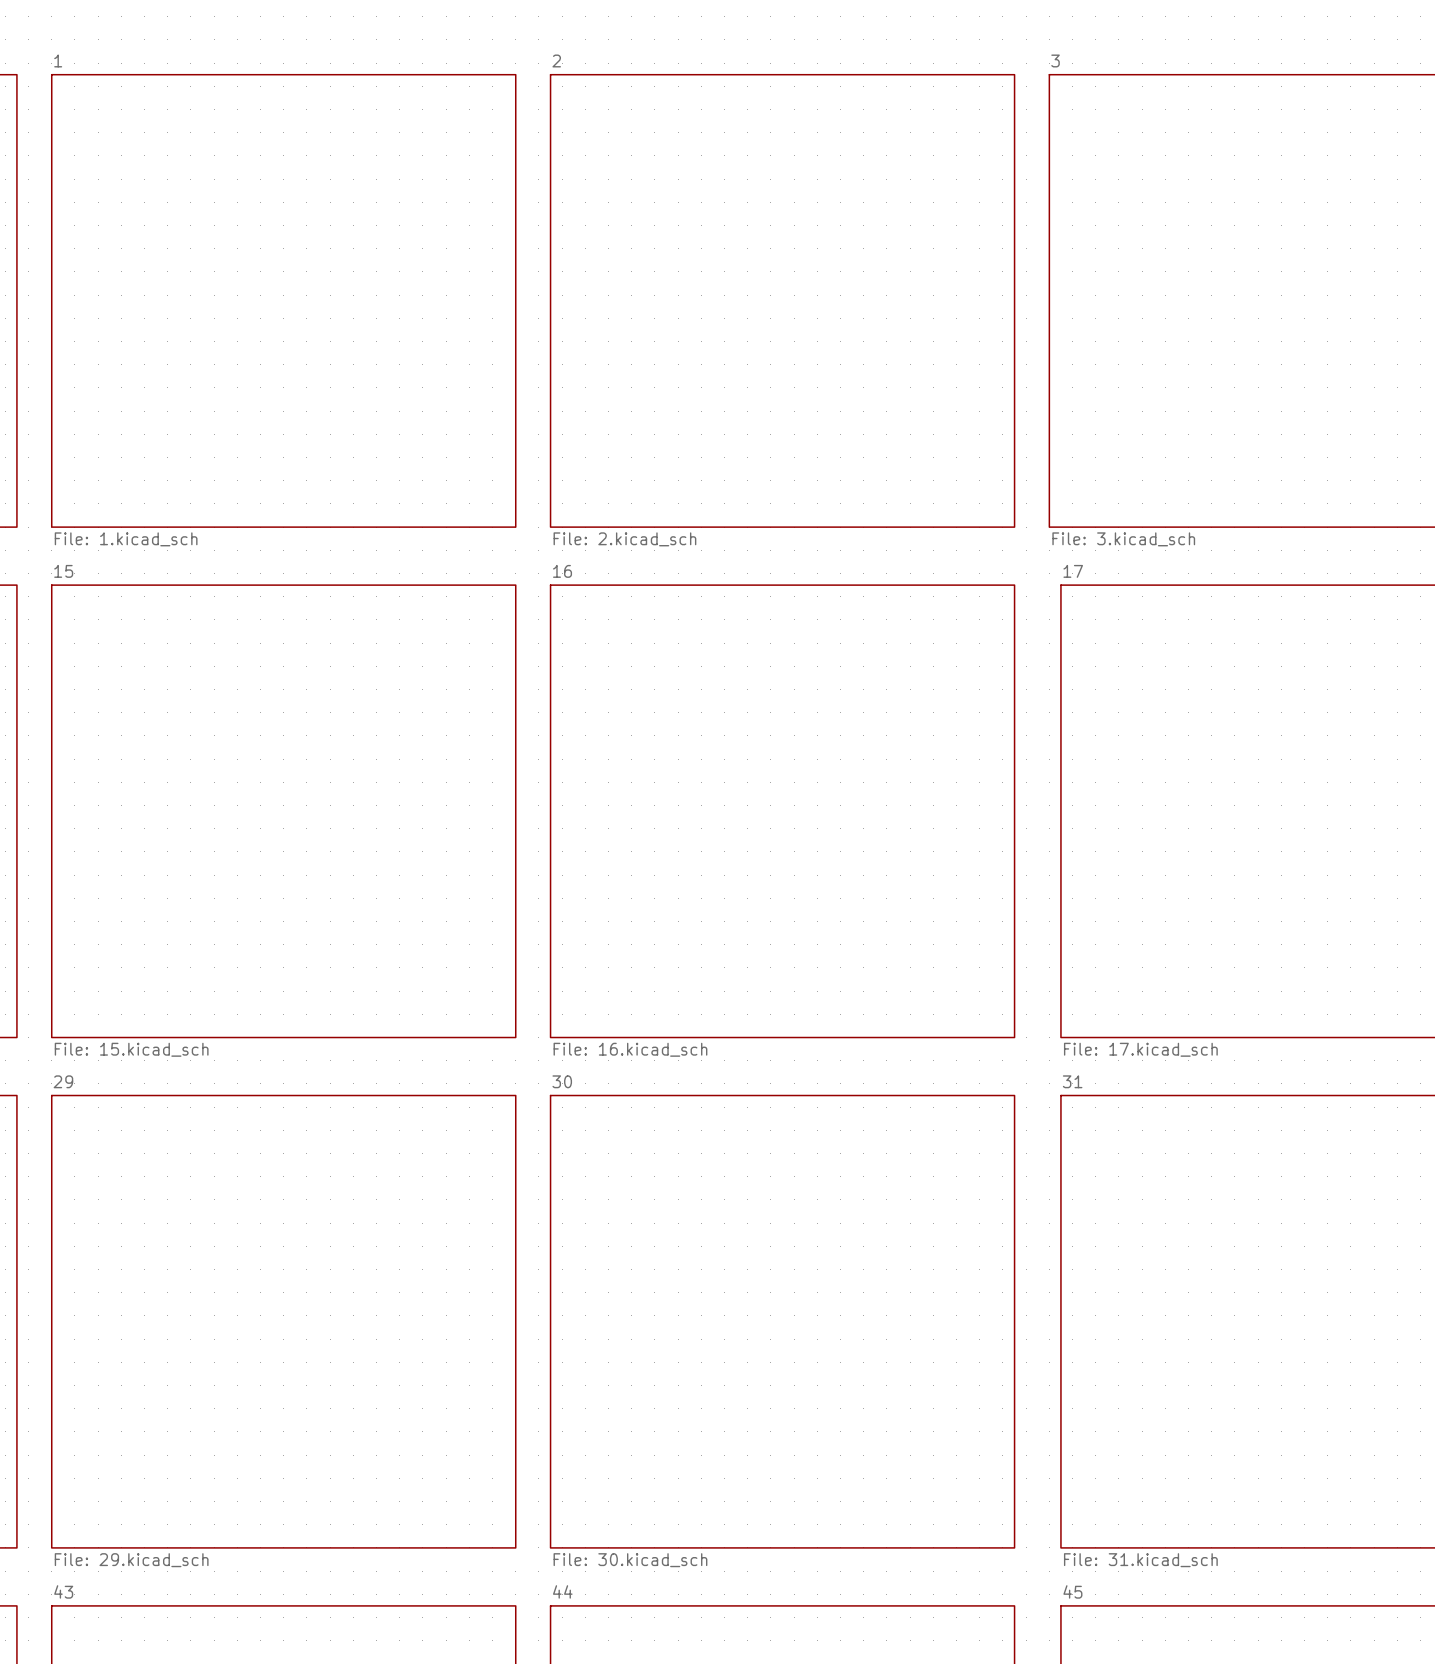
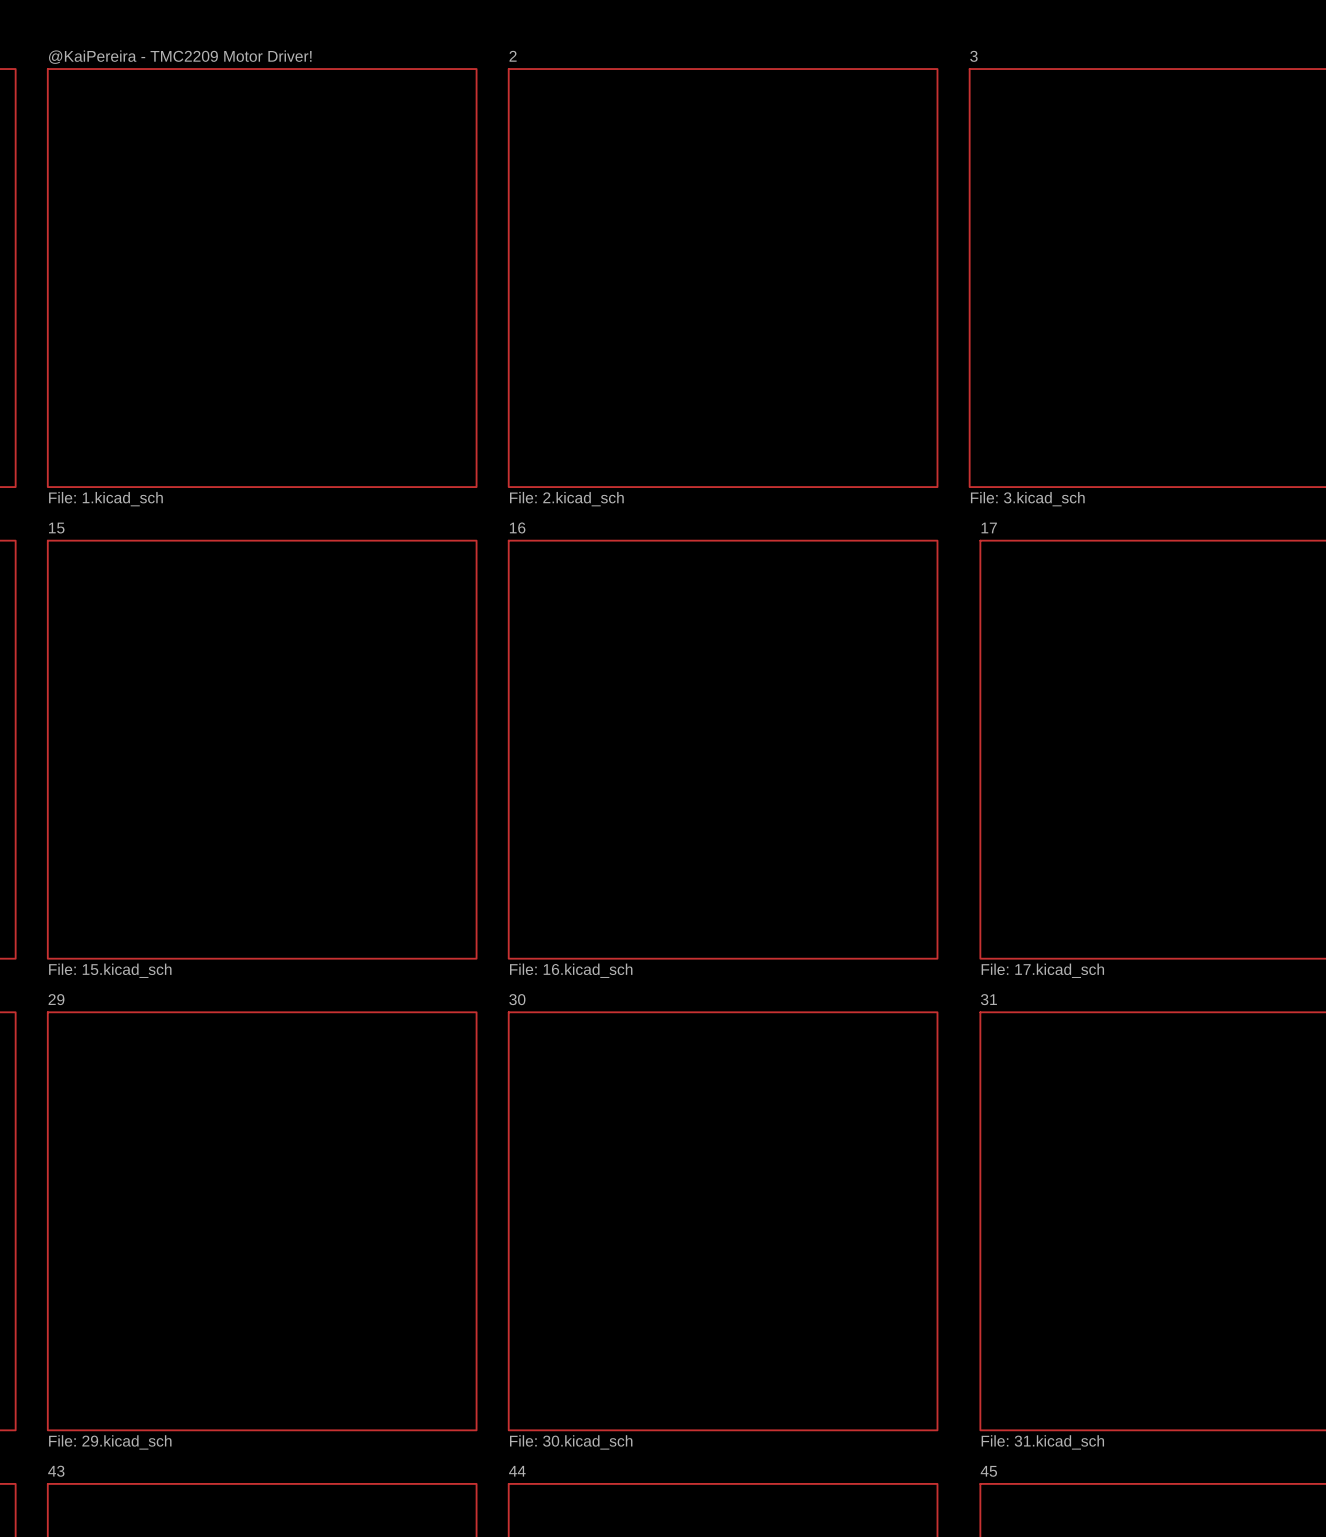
sheet 1 name: 1 (58, 60) -> @KaiPereira - TMC2209 Motor Driver! (180, 57)

